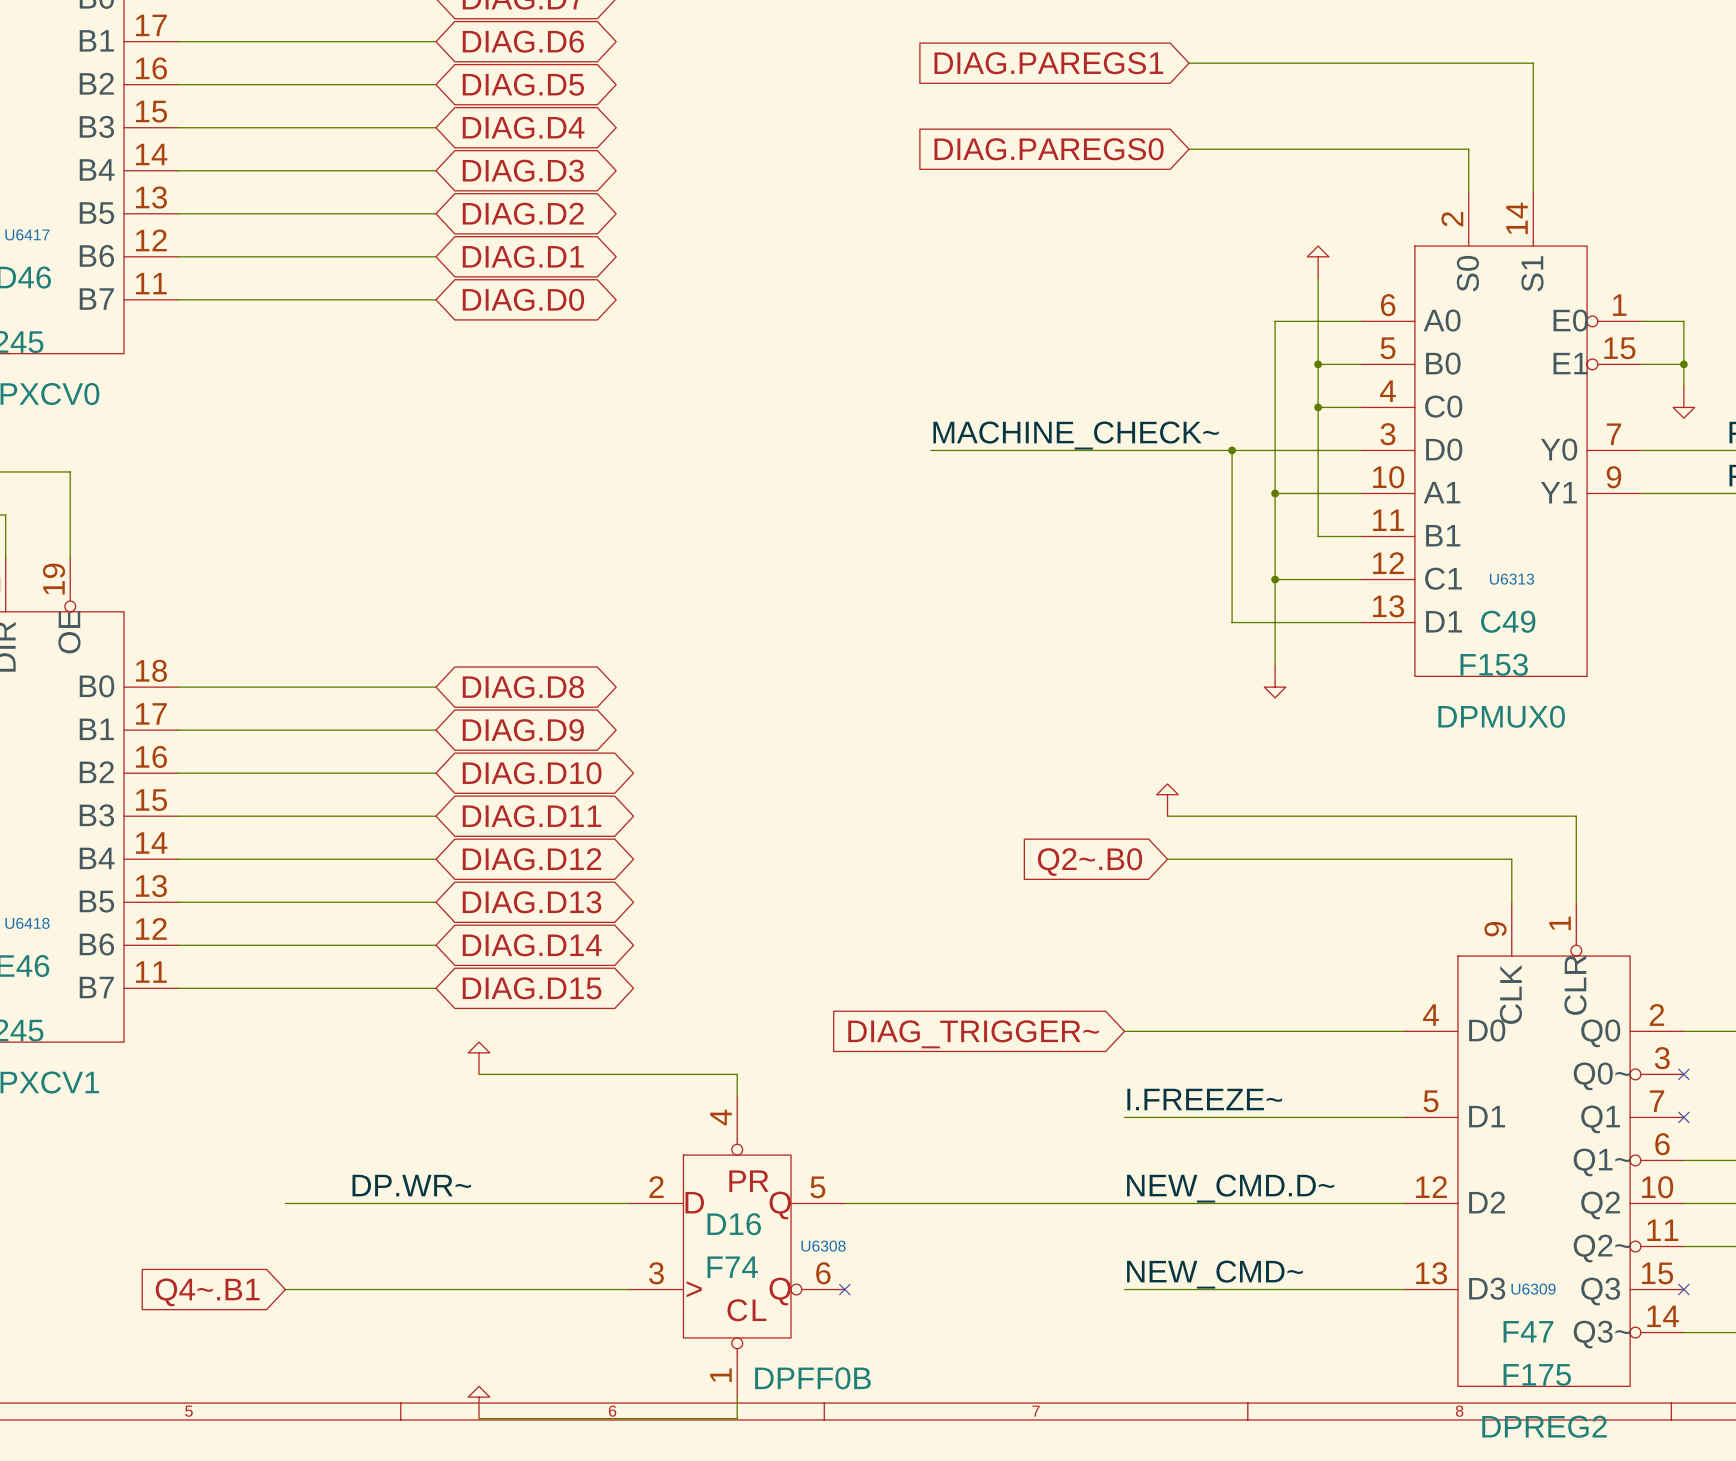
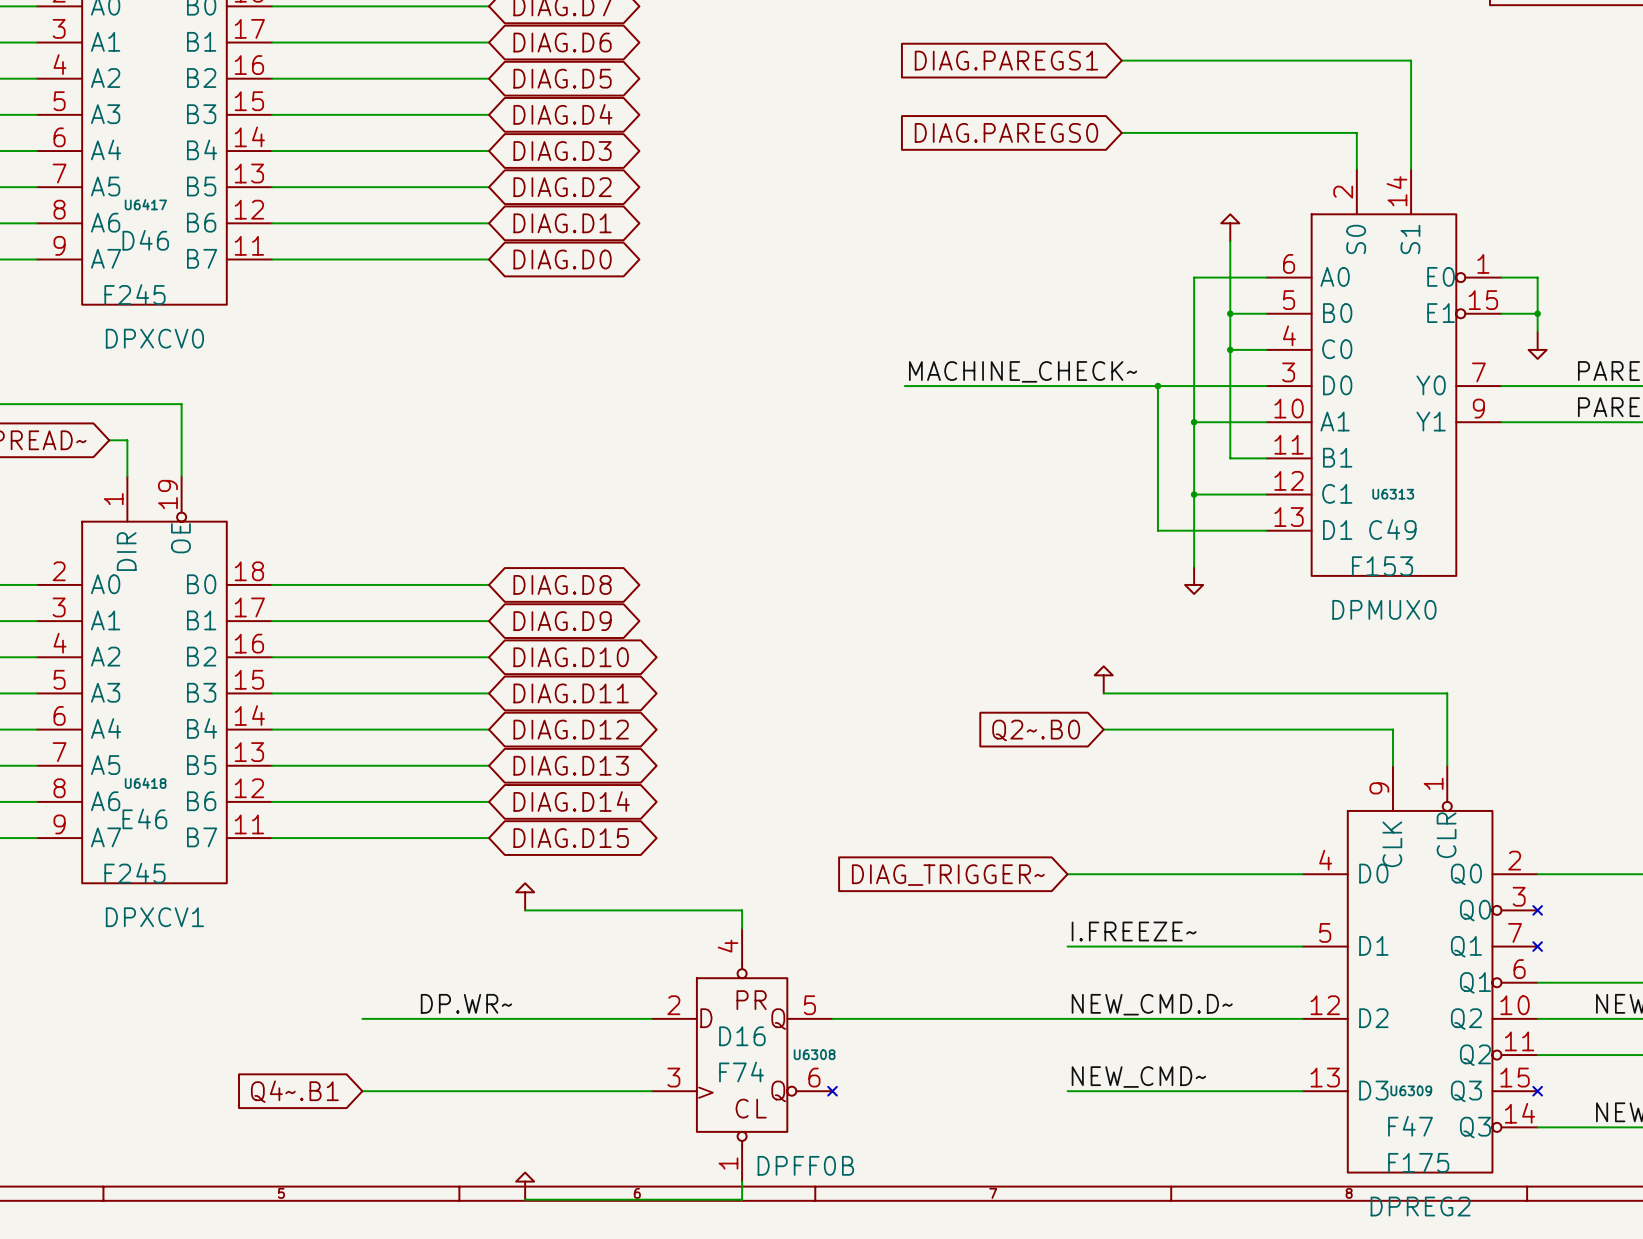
U6309 pin name: Q0~ (1602, 1076) -> Q0 (1475, 910)
U6309 pin name: Q1~ (1602, 1162) -> Q1 (1475, 982)
U6309 pin name: Q2~ (1602, 1248) -> Q2 (1475, 1055)
U6309 pin name: Q3~ (1602, 1334) -> Q3 (1475, 1127)

